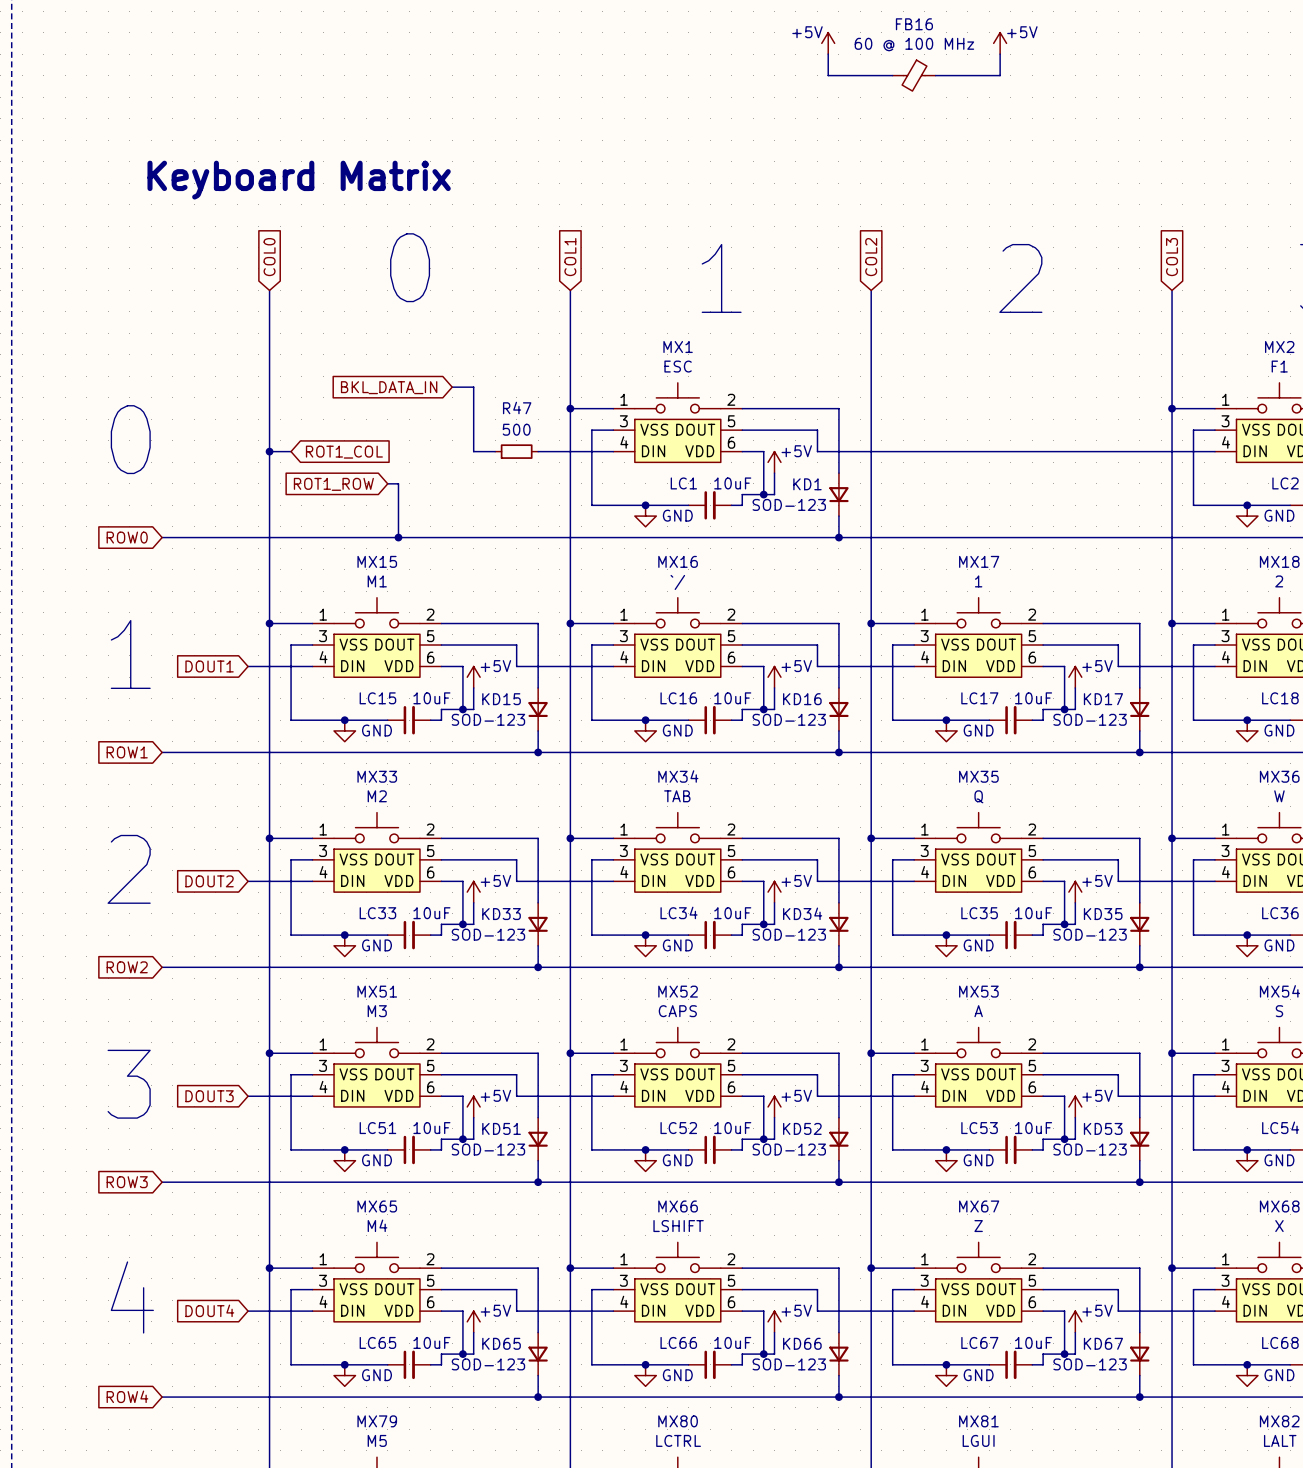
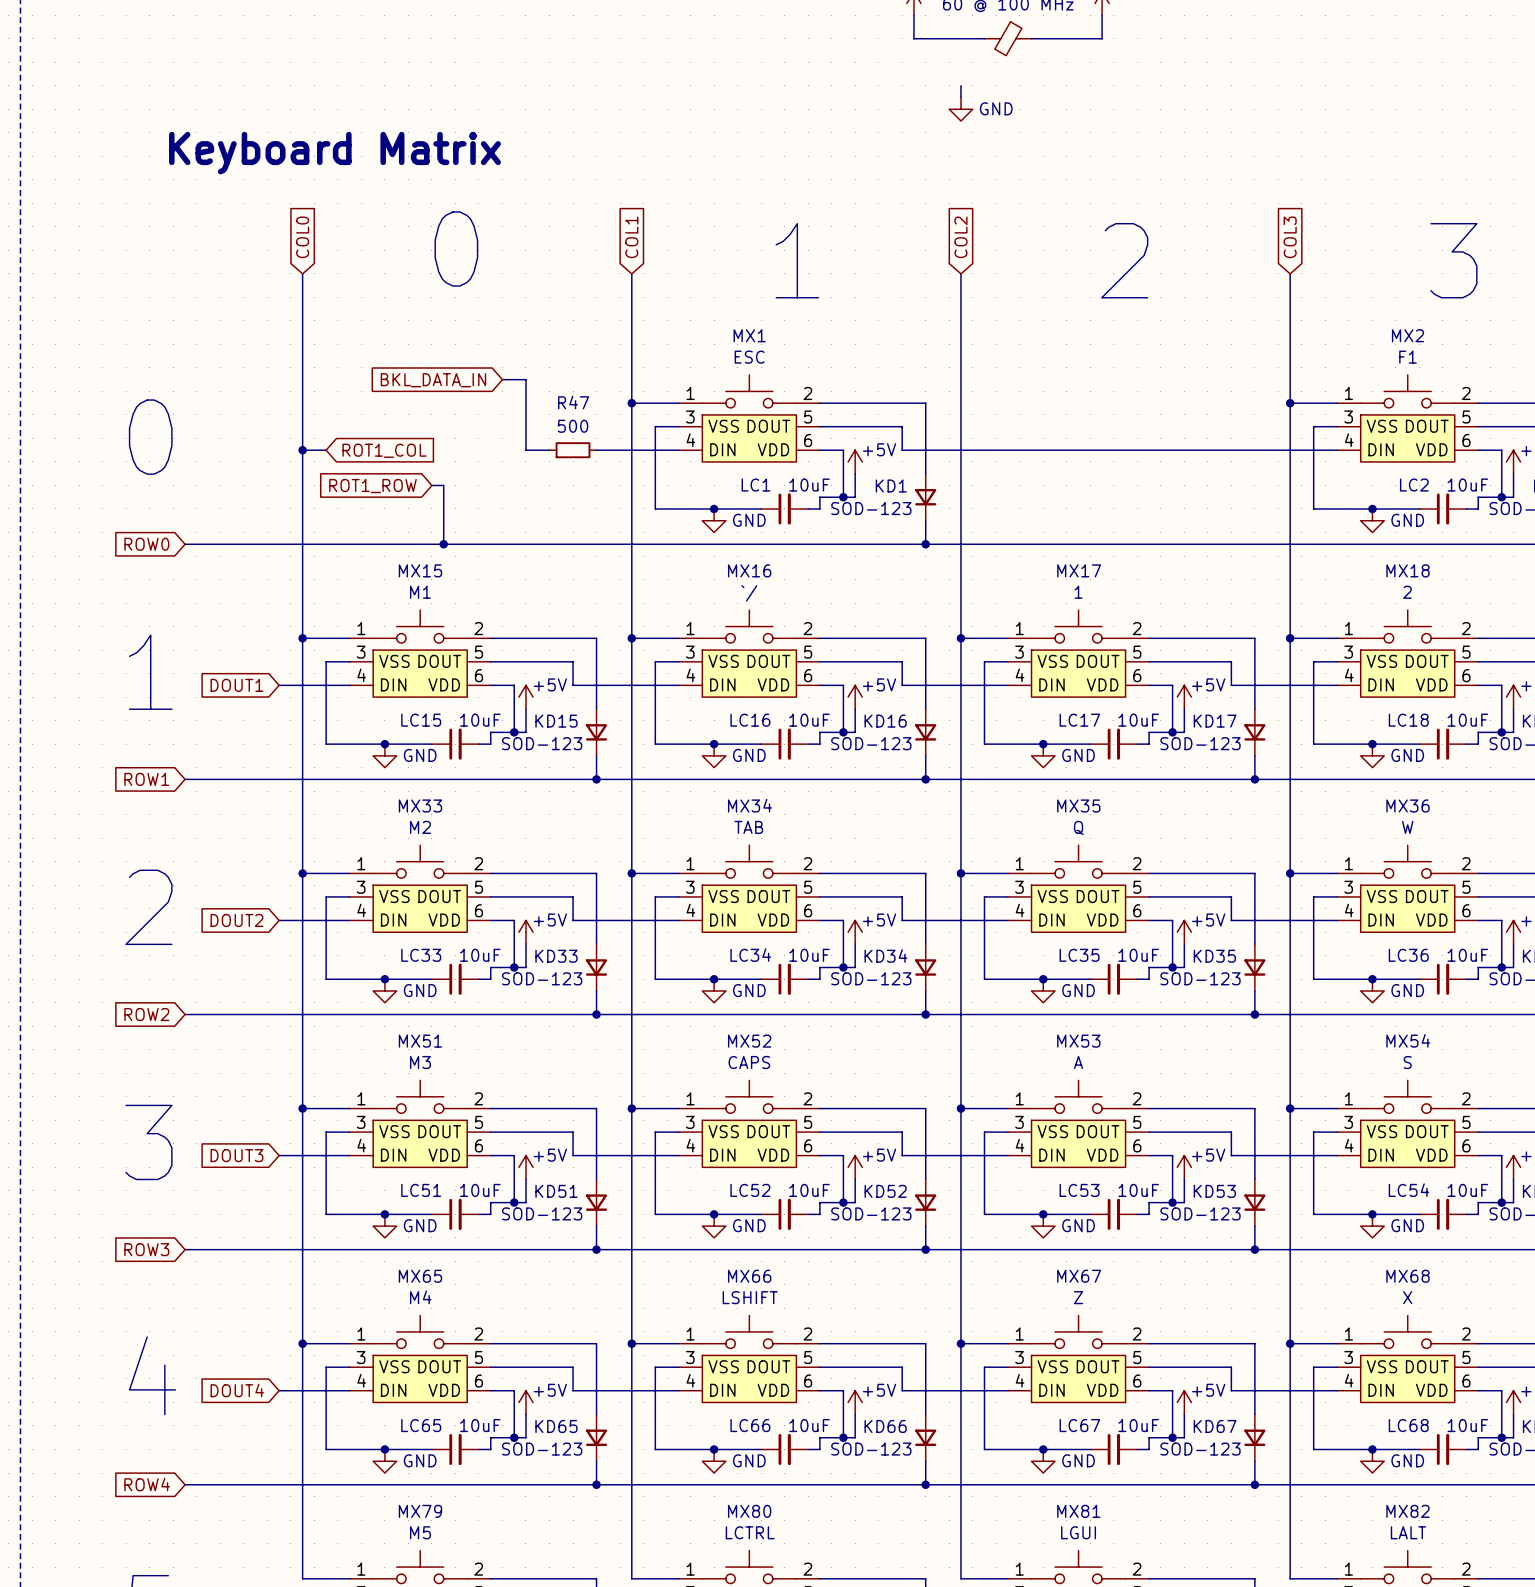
wire: none -> (960, 85) (960, 97)
power symbol: none -> GND (960, 109)

